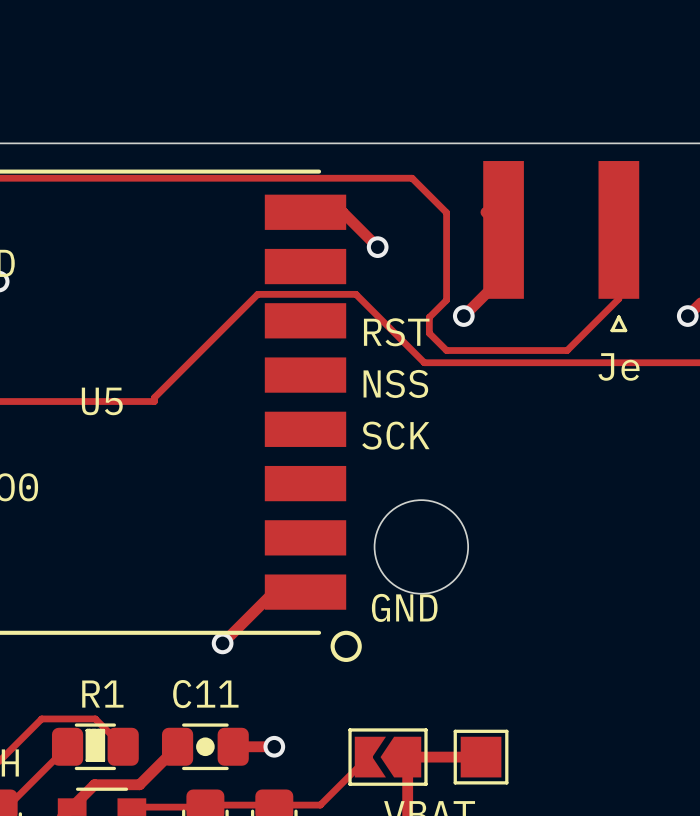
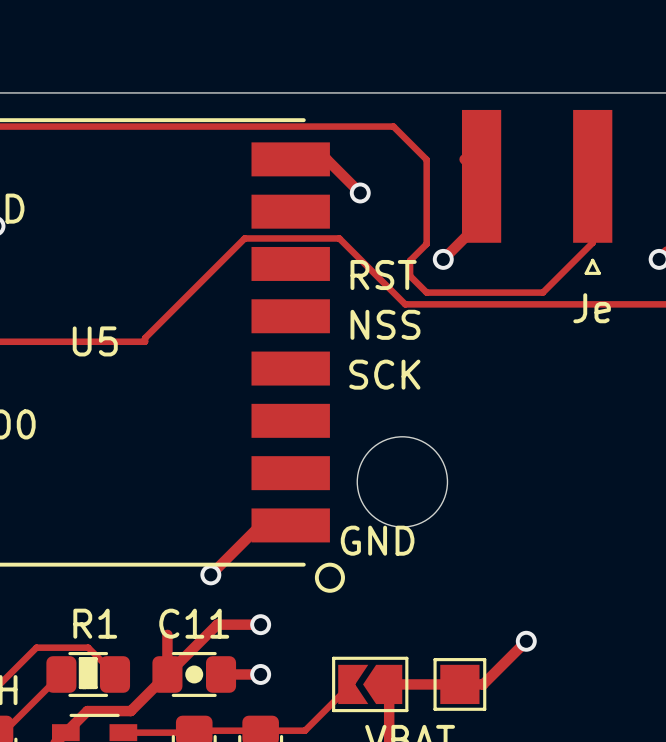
track: none -> (260, 624) (217, 624) (167, 674) (167, 634)
via: none -> (260, 624)
track: none -> (526, 641) (483, 684) (459, 684)
via: none -> (526, 641)

